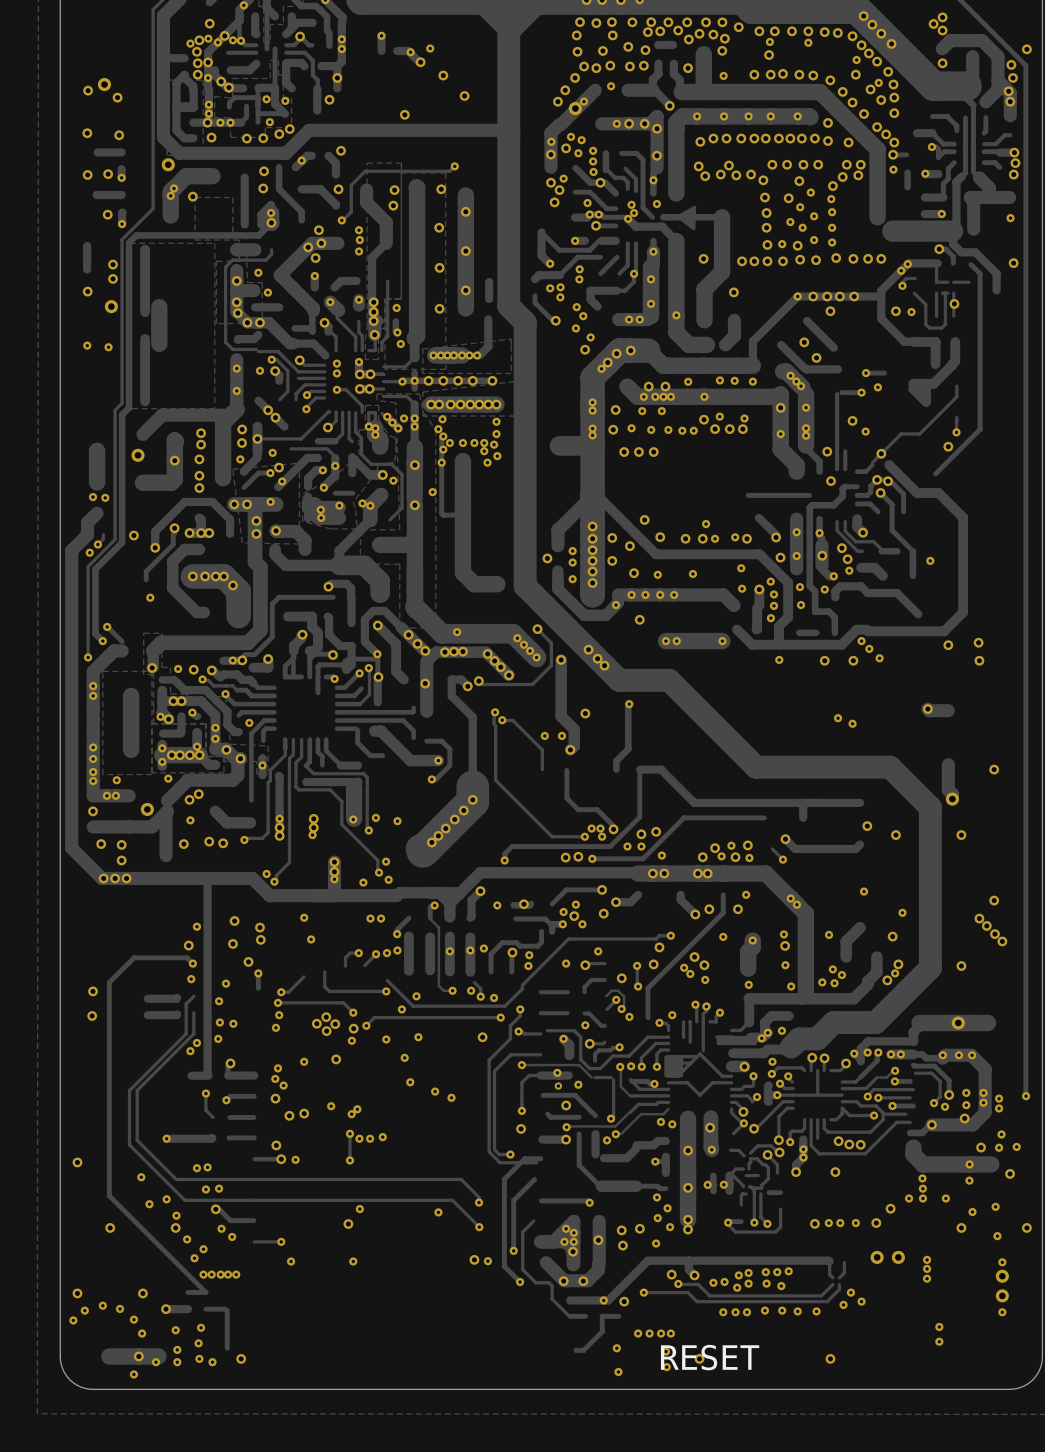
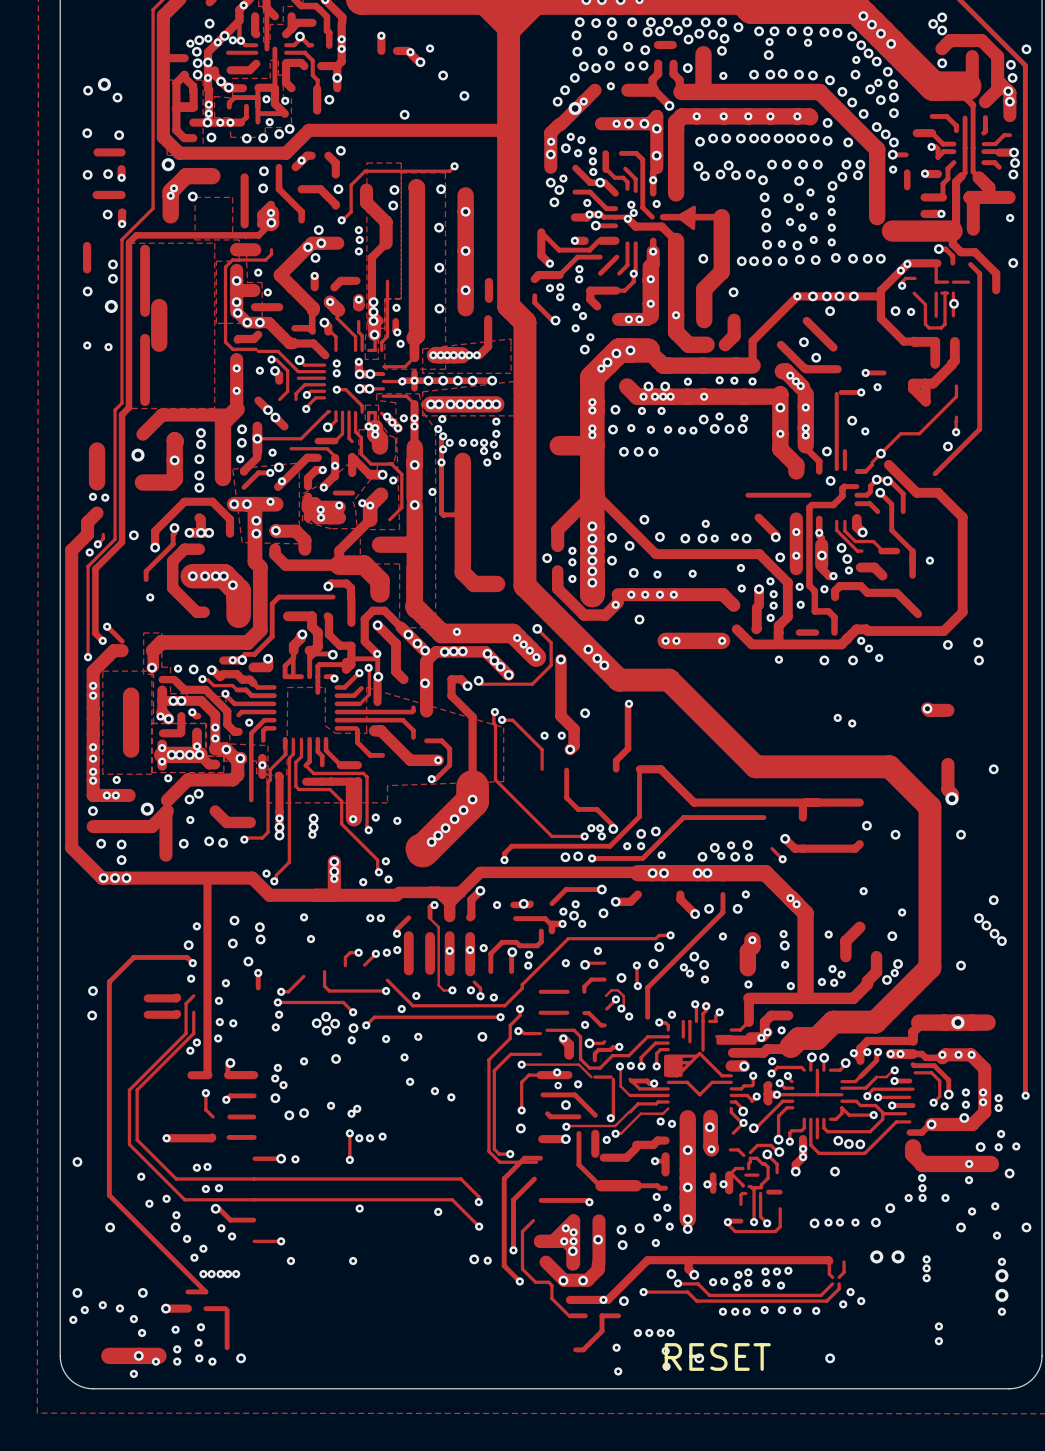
zone outline: none -> (287, 687) (286, 774) (266, 775) (267, 802) (387, 802) (387, 785) (503, 781) (503, 727) (366, 687) (366, 733) (335, 733) (325, 725) (325, 687) (287, 687)
via: (276, 1145) -> none
via: (348, 1224) -> none

